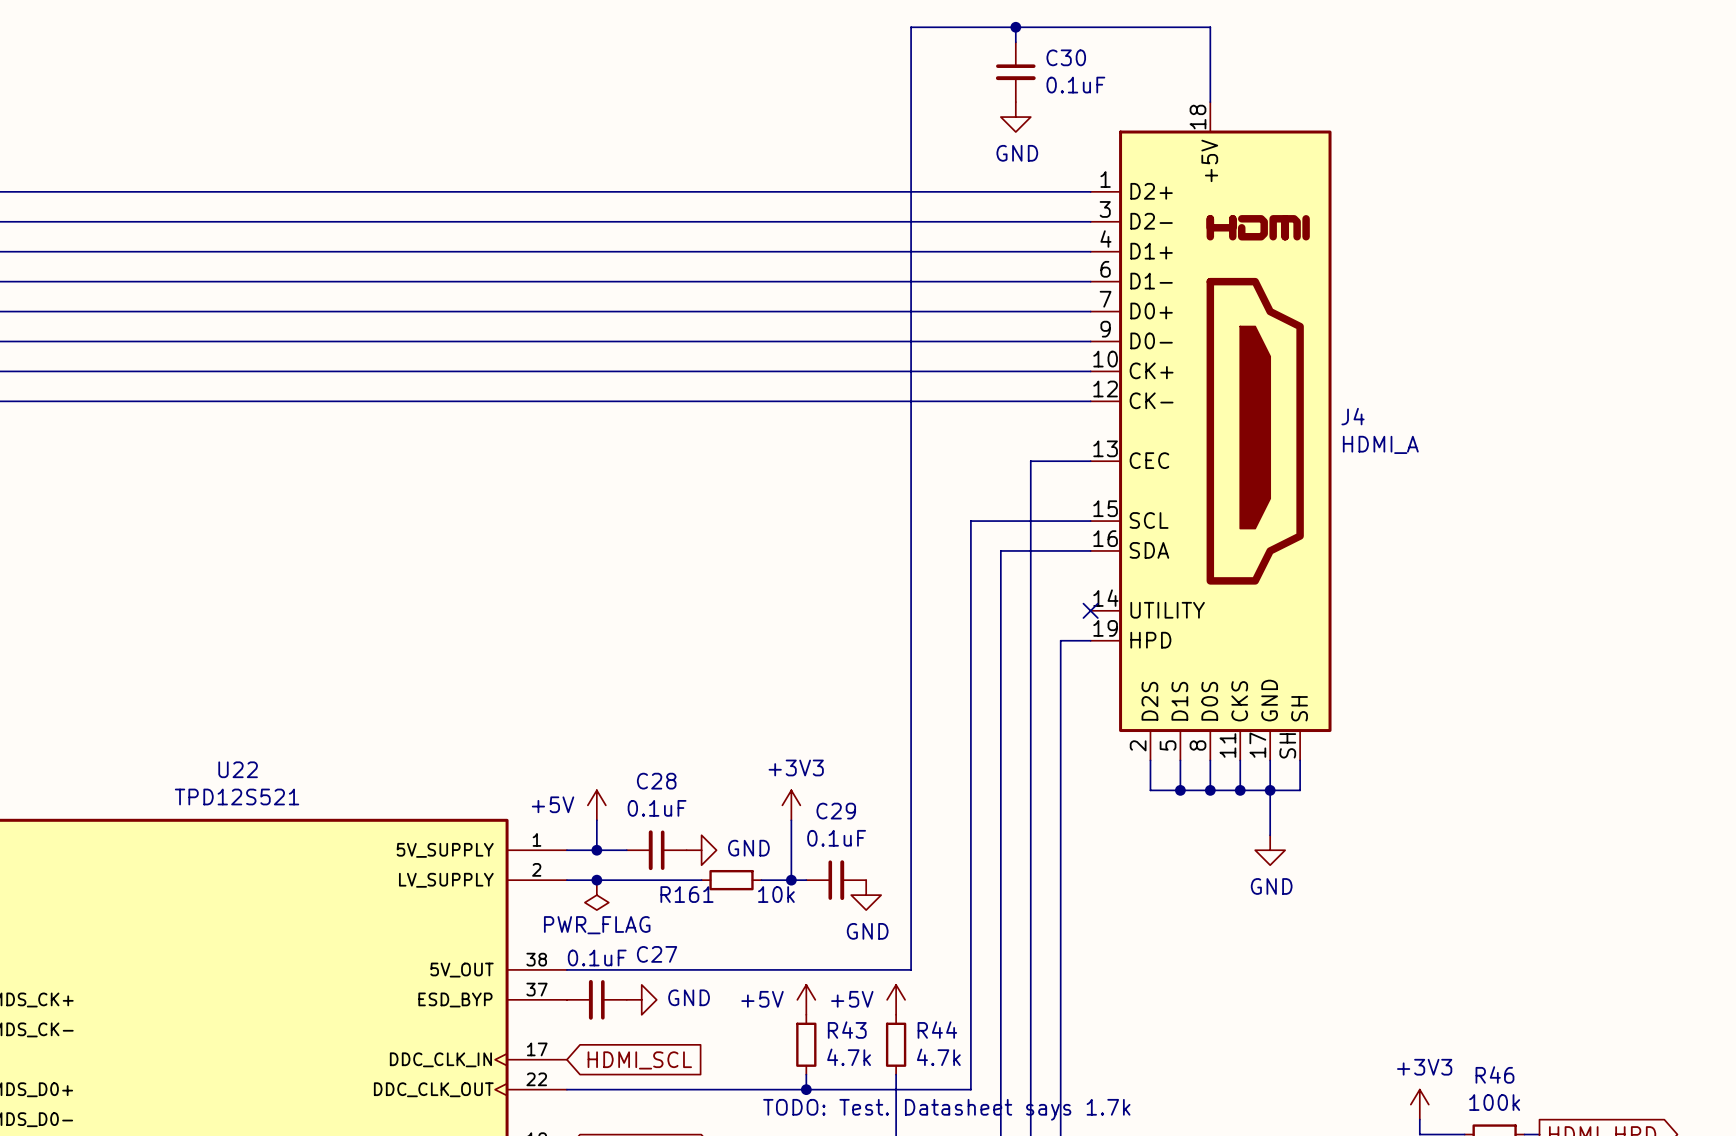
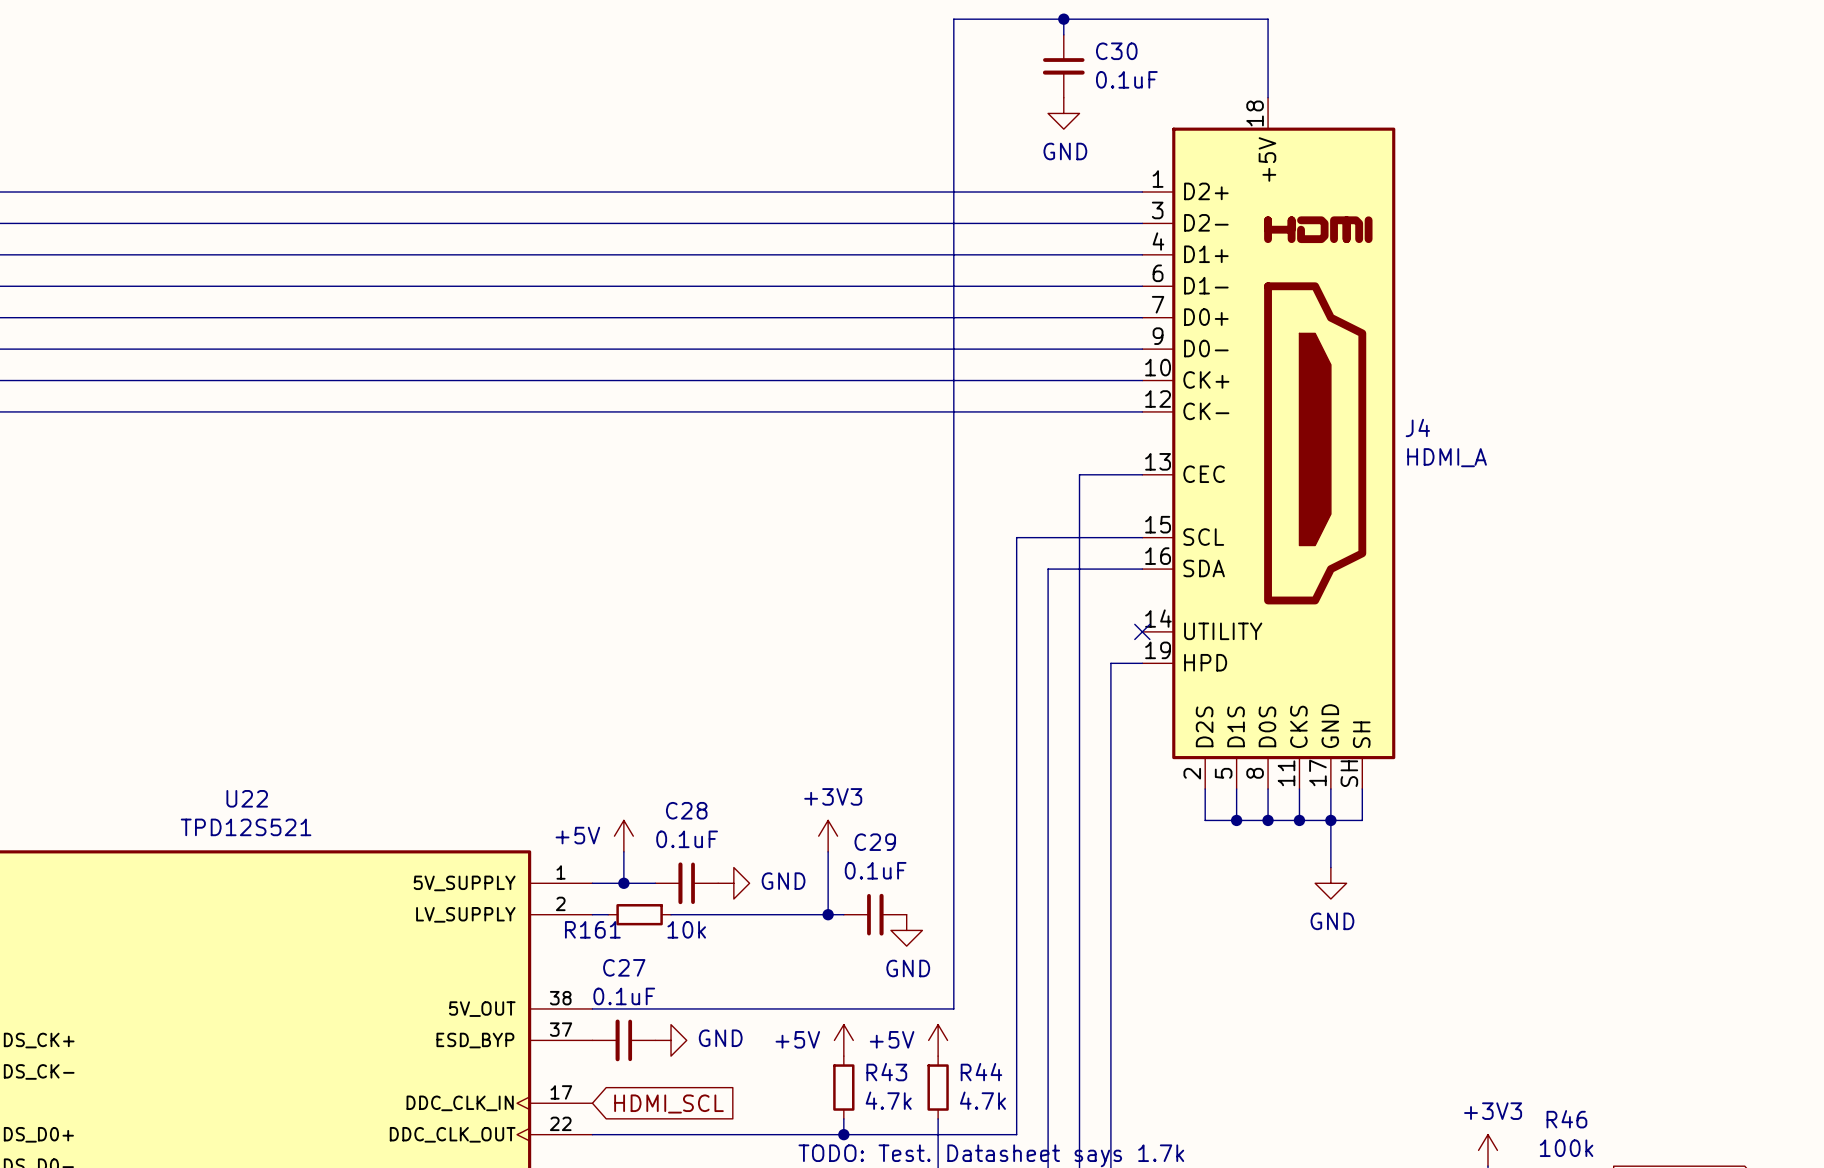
wire: (581, 880) (641, 880) -> (733, 914) (796, 914)
junction: (596, 880) -> none
R161 position: (731, 880) -> (639, 914)
power symbol: PWR_FLAG (596, 895) -> none
C27 name position: C27 (657, 954) -> C27 (624, 967)

